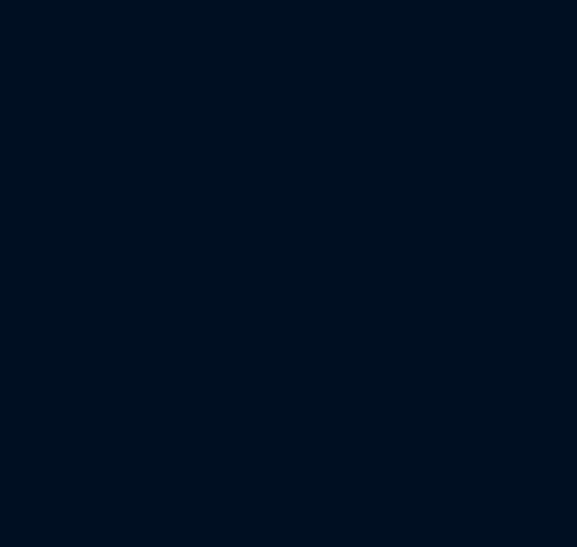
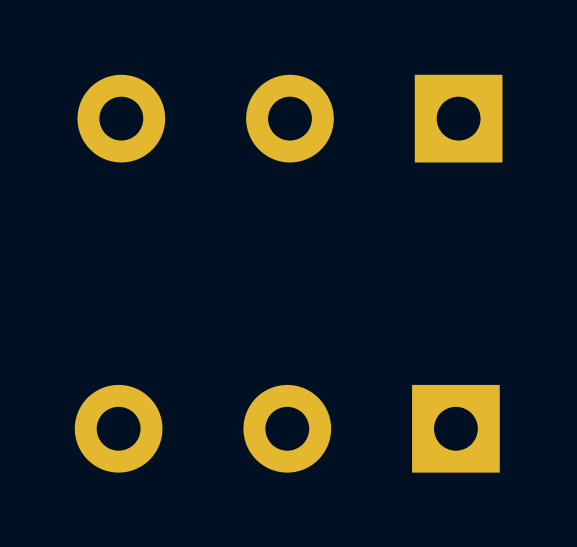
part: none -> (289, 118)
part: none -> (287, 428)

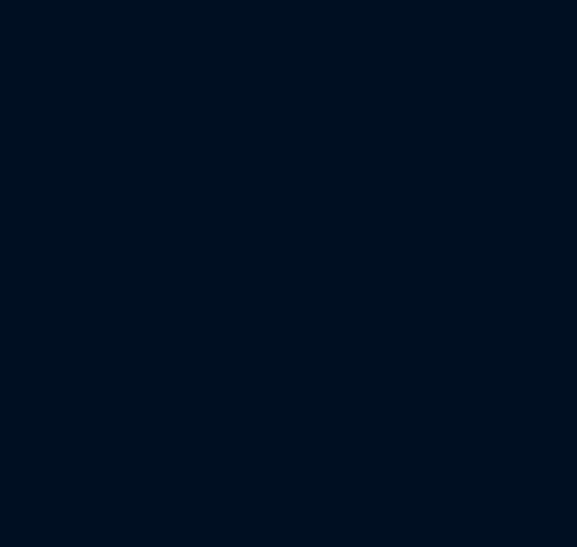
part: (289, 118) -> none
part: (287, 428) -> none

